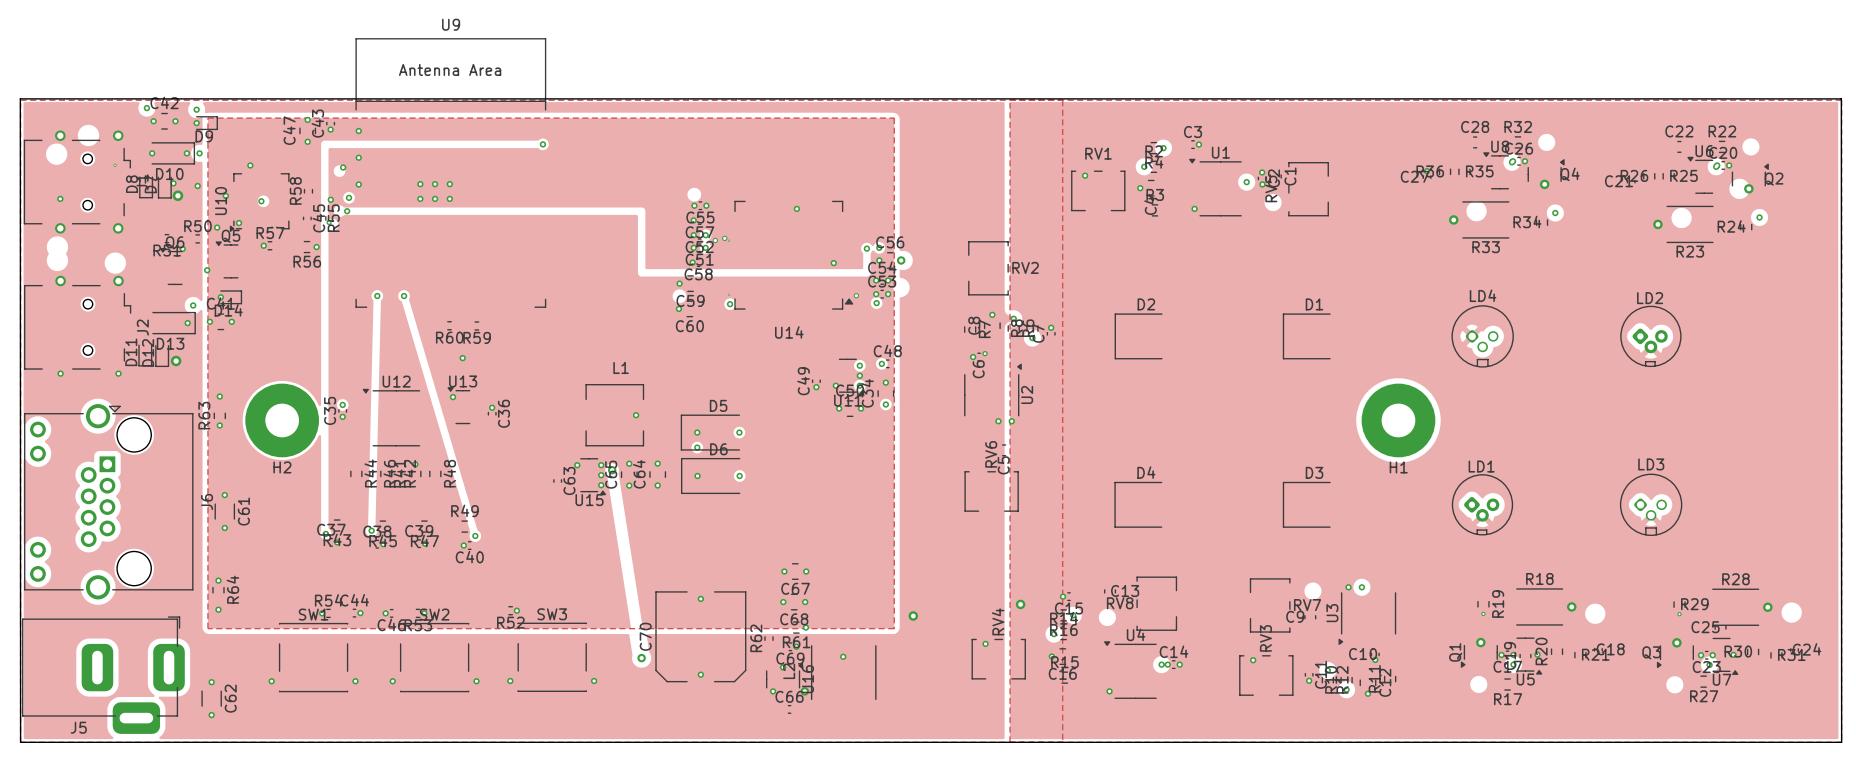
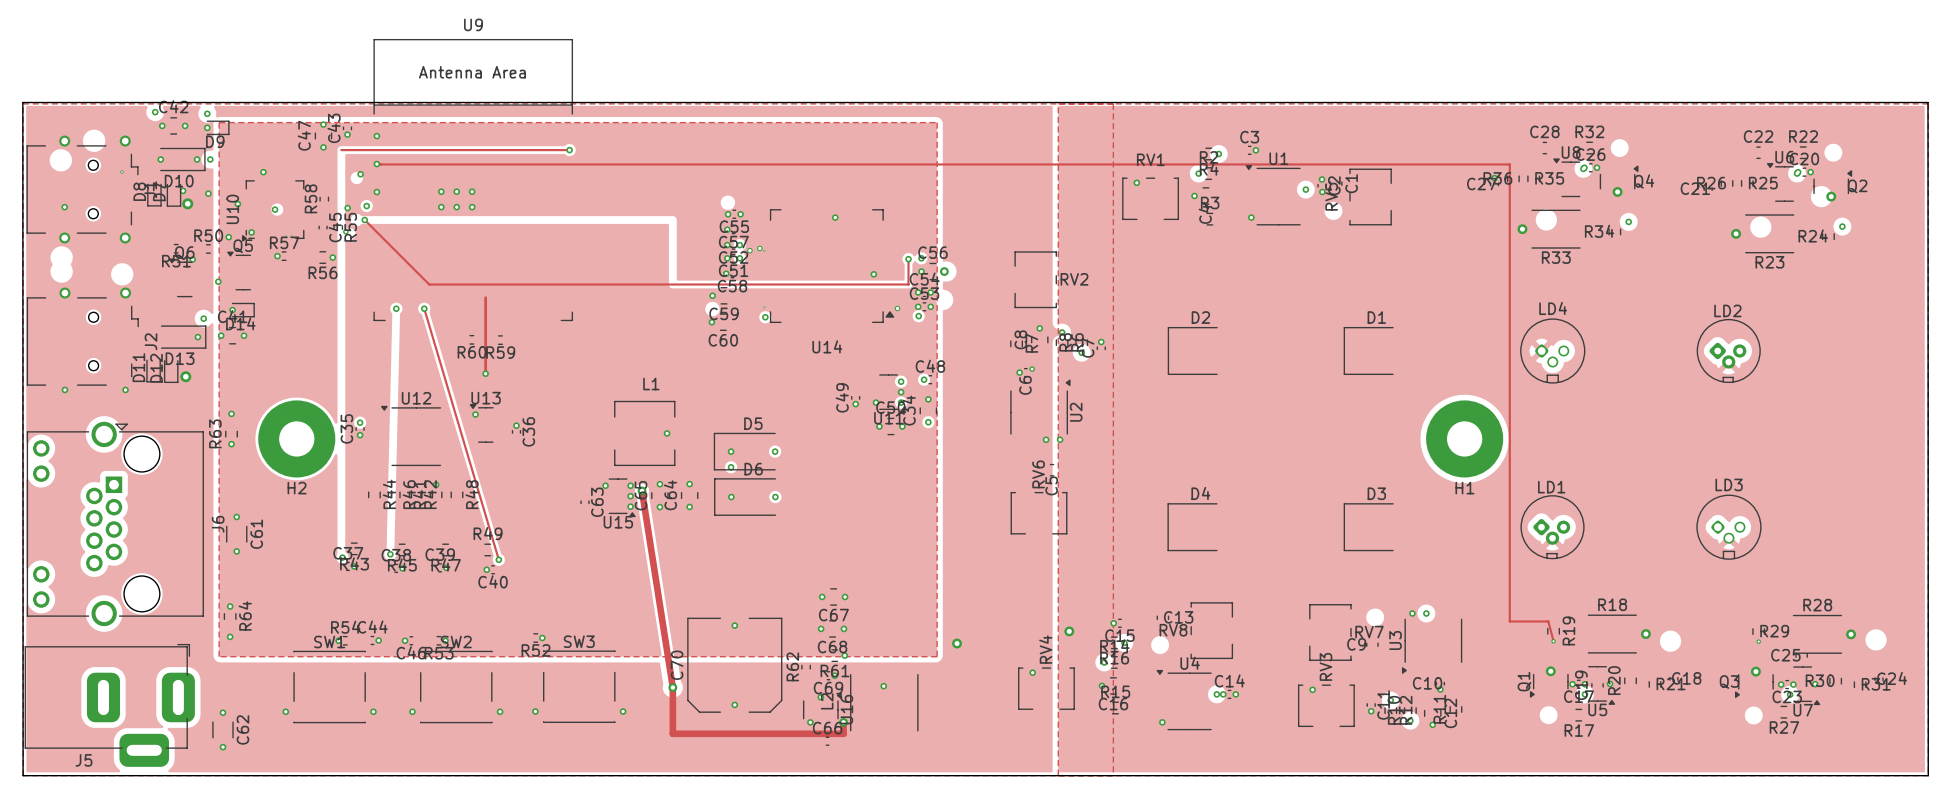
track: none -> (341, 150) (569, 150)
track: none -> (376, 164) (1509, 164) (1509, 621) (1548, 621) (1553, 641)
track: none -> (364, 220) (429, 284) (908, 284) (908, 259)
track: none -> (485, 297) (485, 373)
track: none -> (424, 308) (498, 559)
track: none -> (642, 490) (672, 687) (672, 733) (843, 733) (843, 722)

